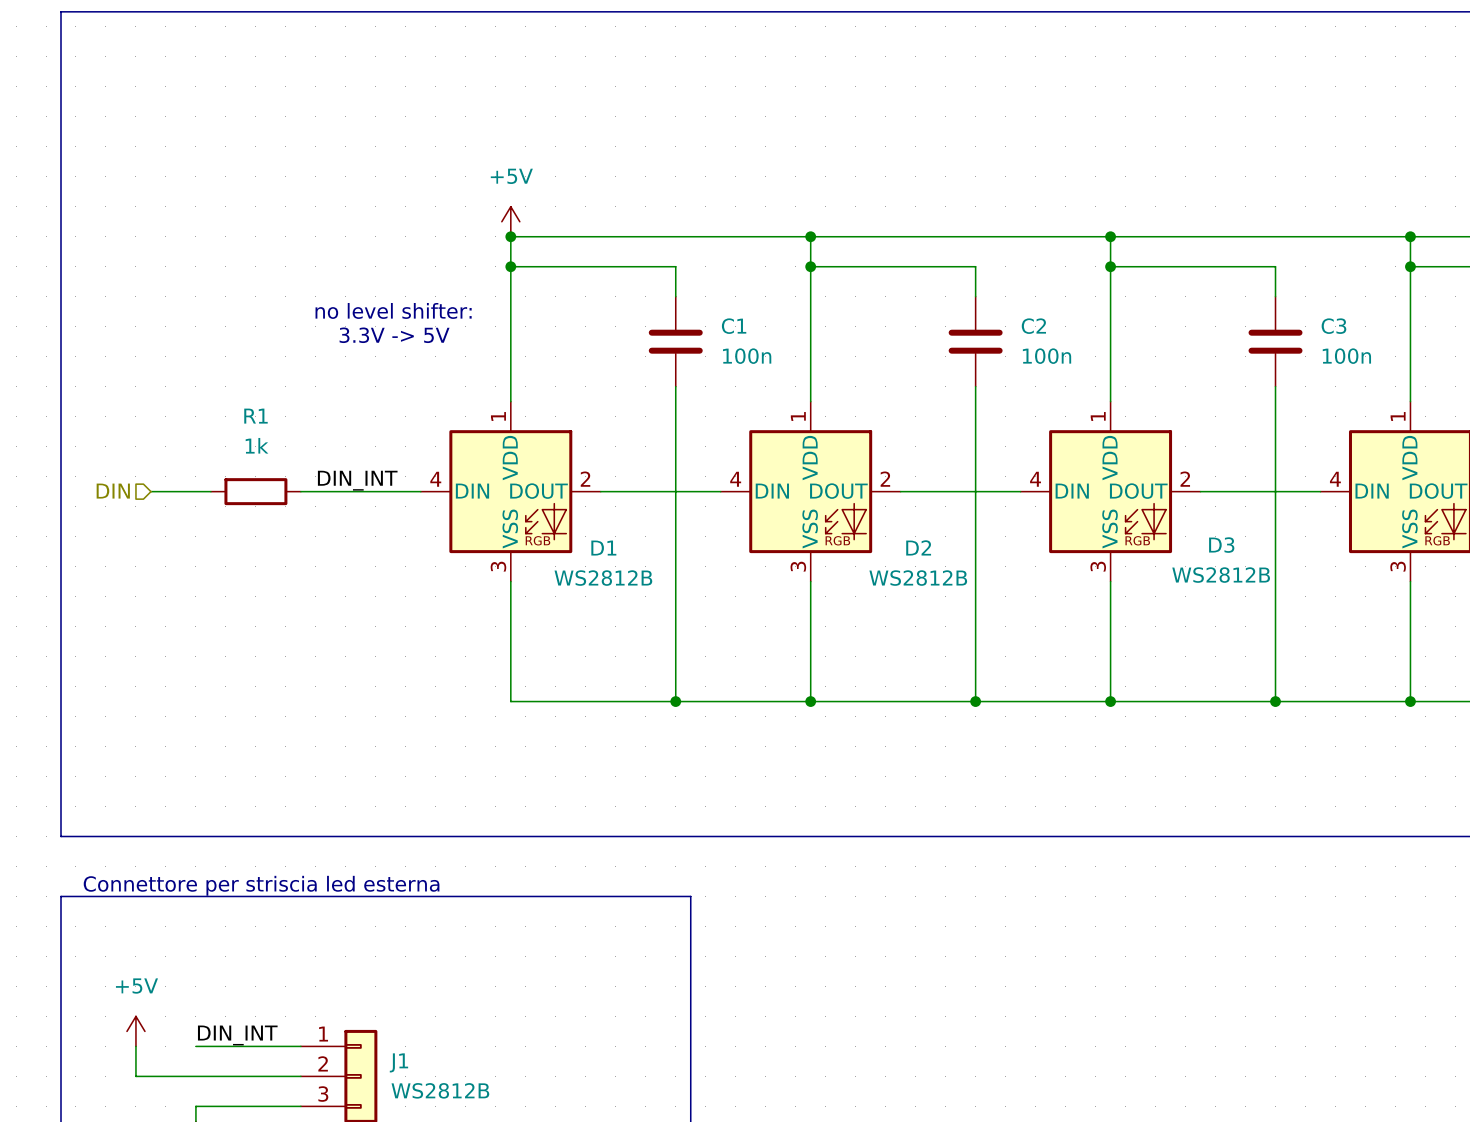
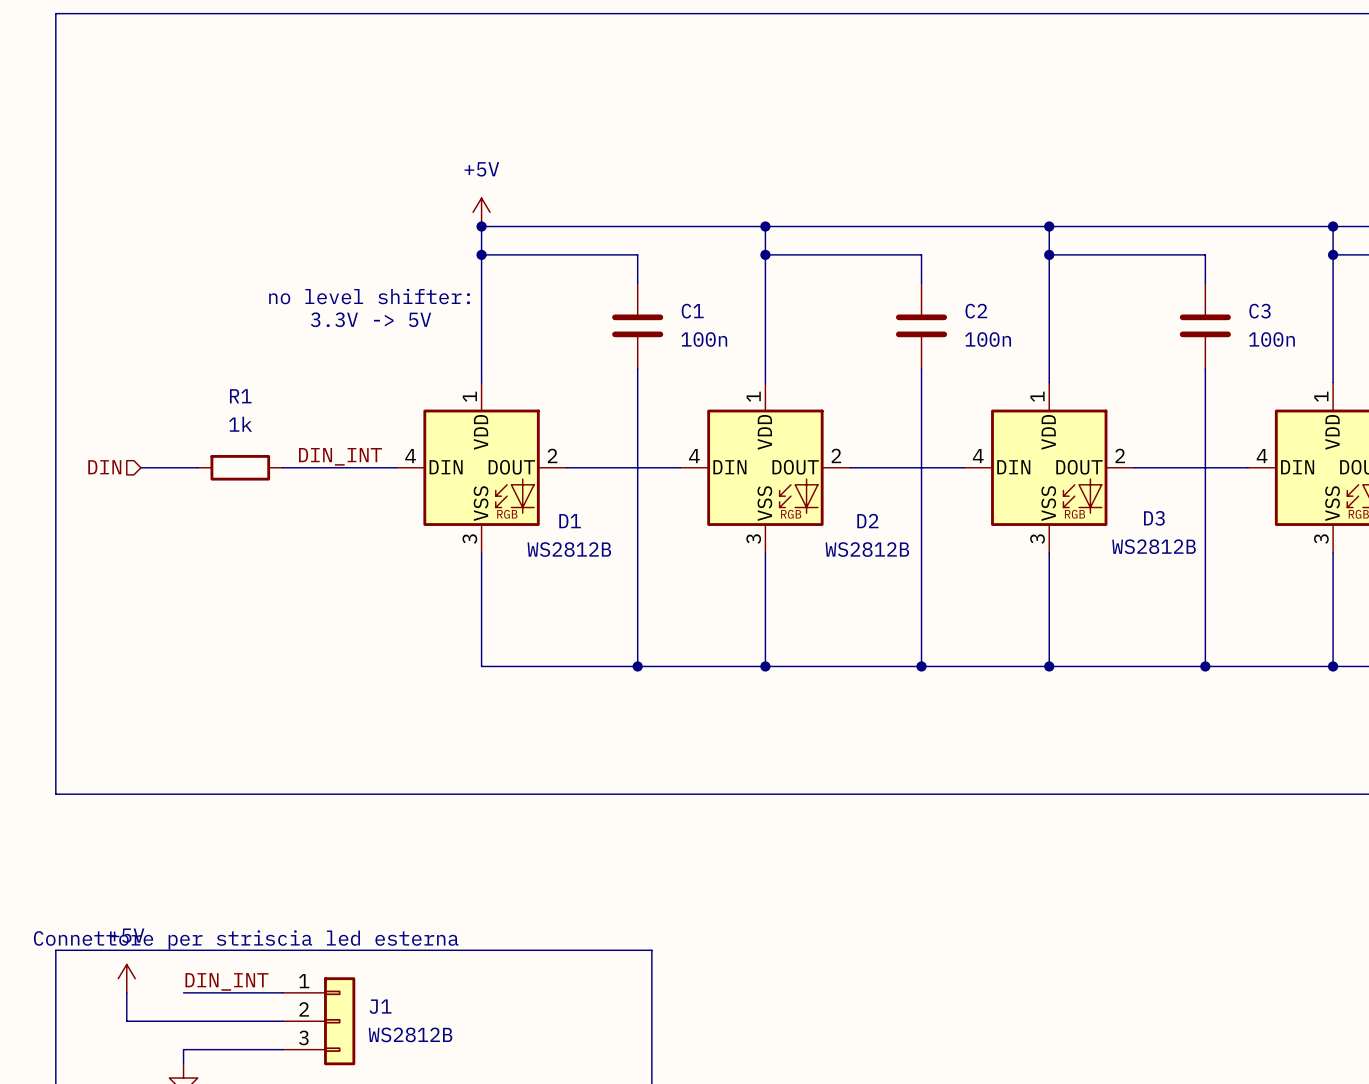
text position: Connettore per striscia led esterna (261, 885) -> Connettore per striscia led esterna (246, 939)
line: (61, 1001) (61, 896) (690, 896) (690, 1001) -> (55, 950) (651, 950)

